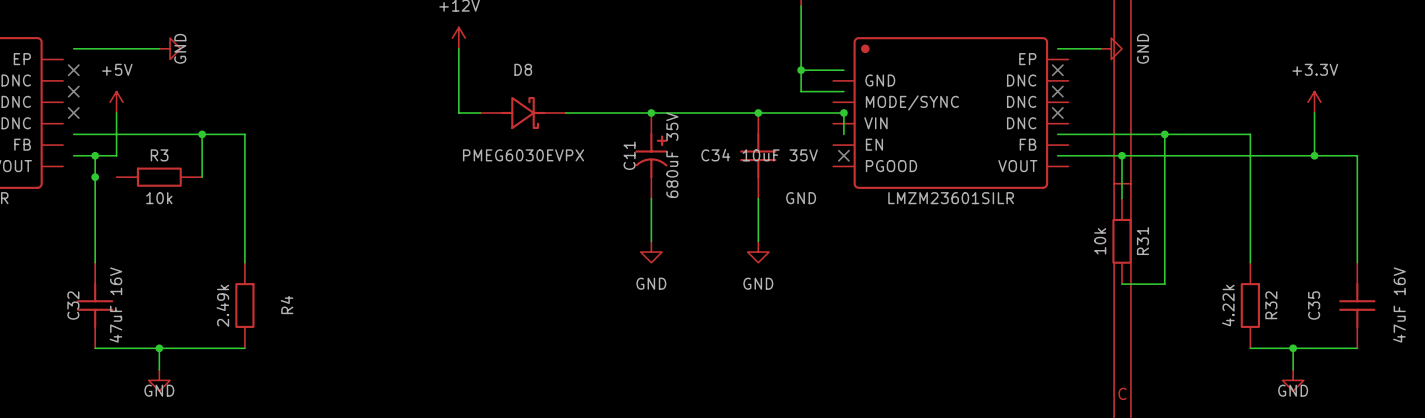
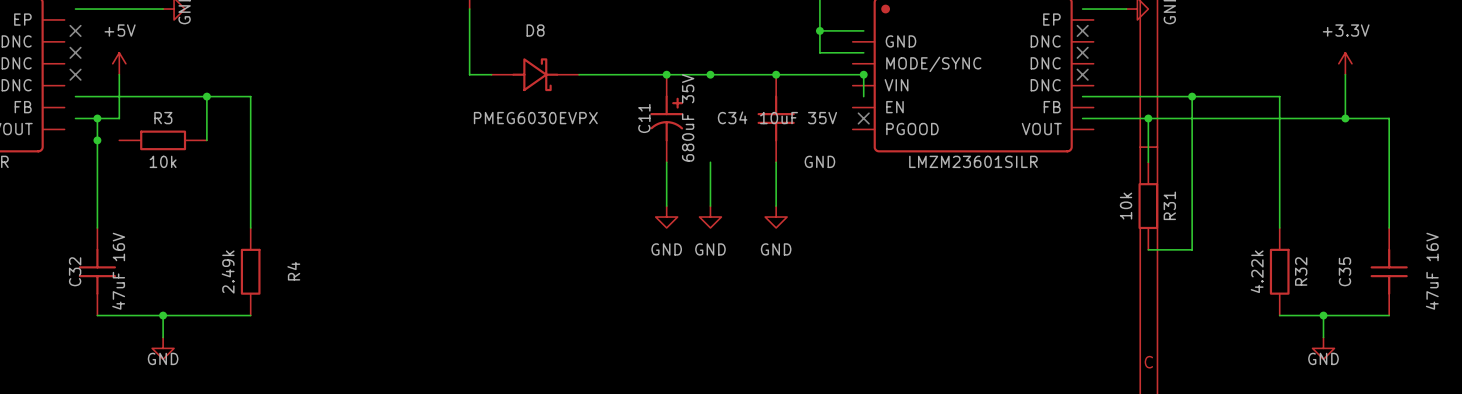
junction: none -> (710, 74)
wire: none -> (710, 162) (710, 206)
power symbol: none -> GND (710, 217)

